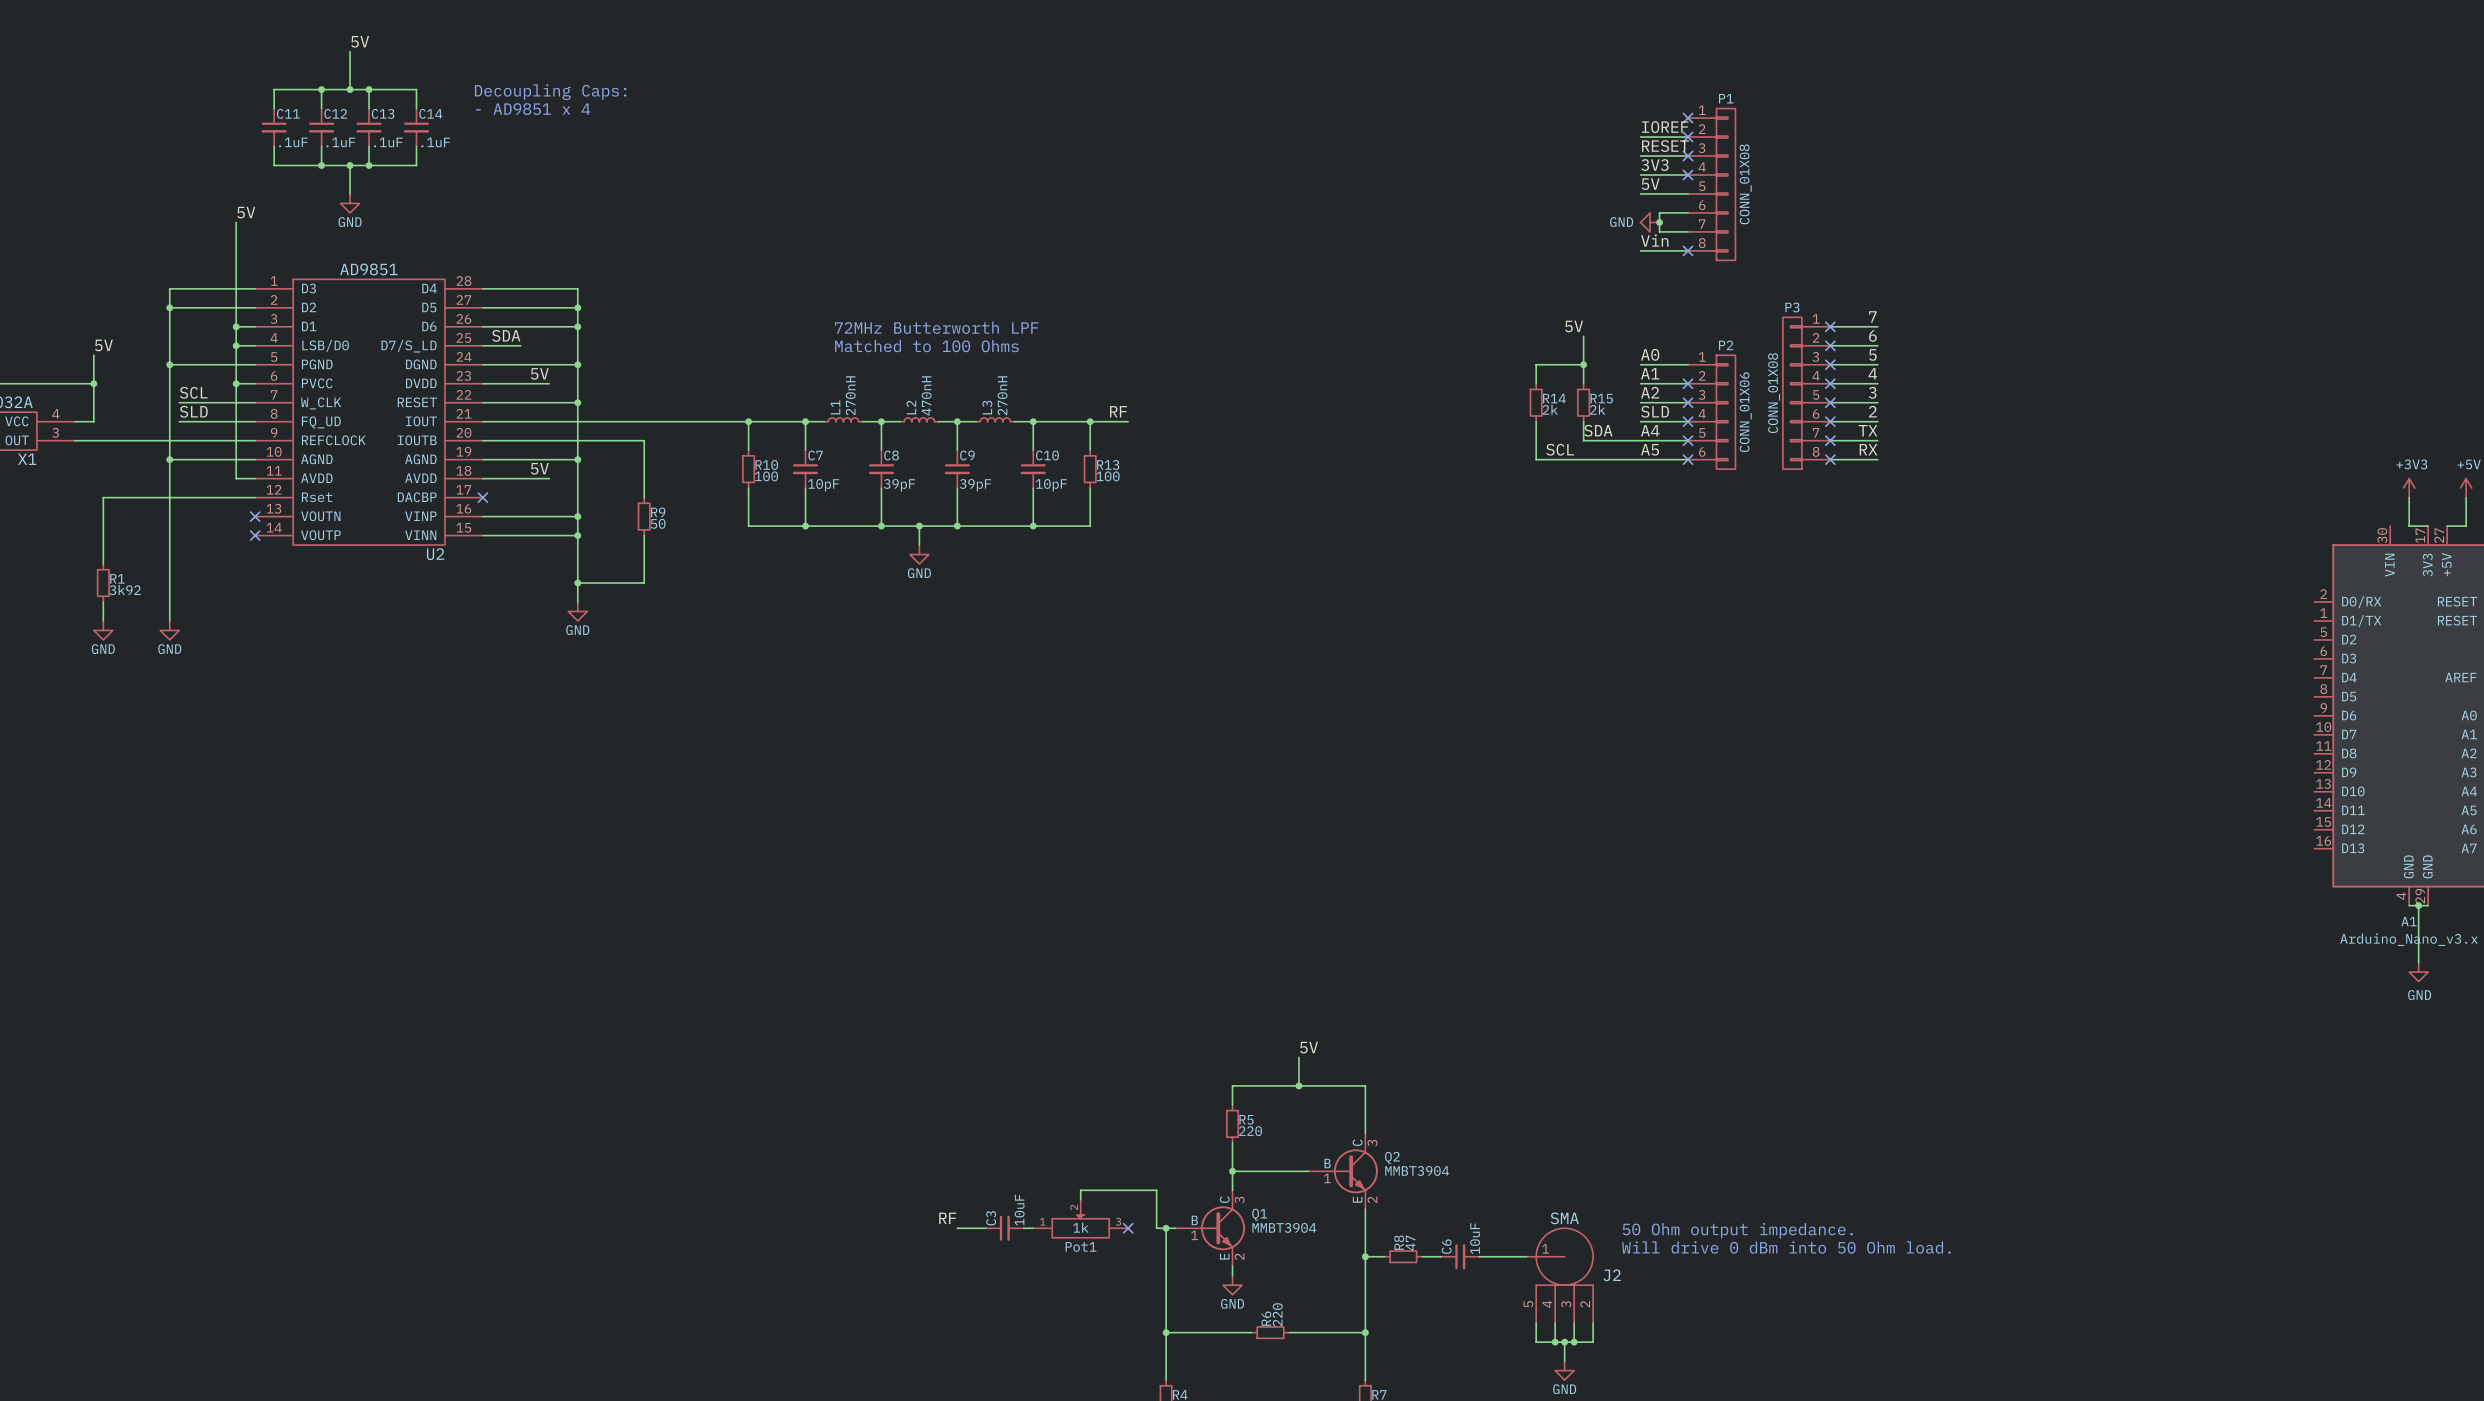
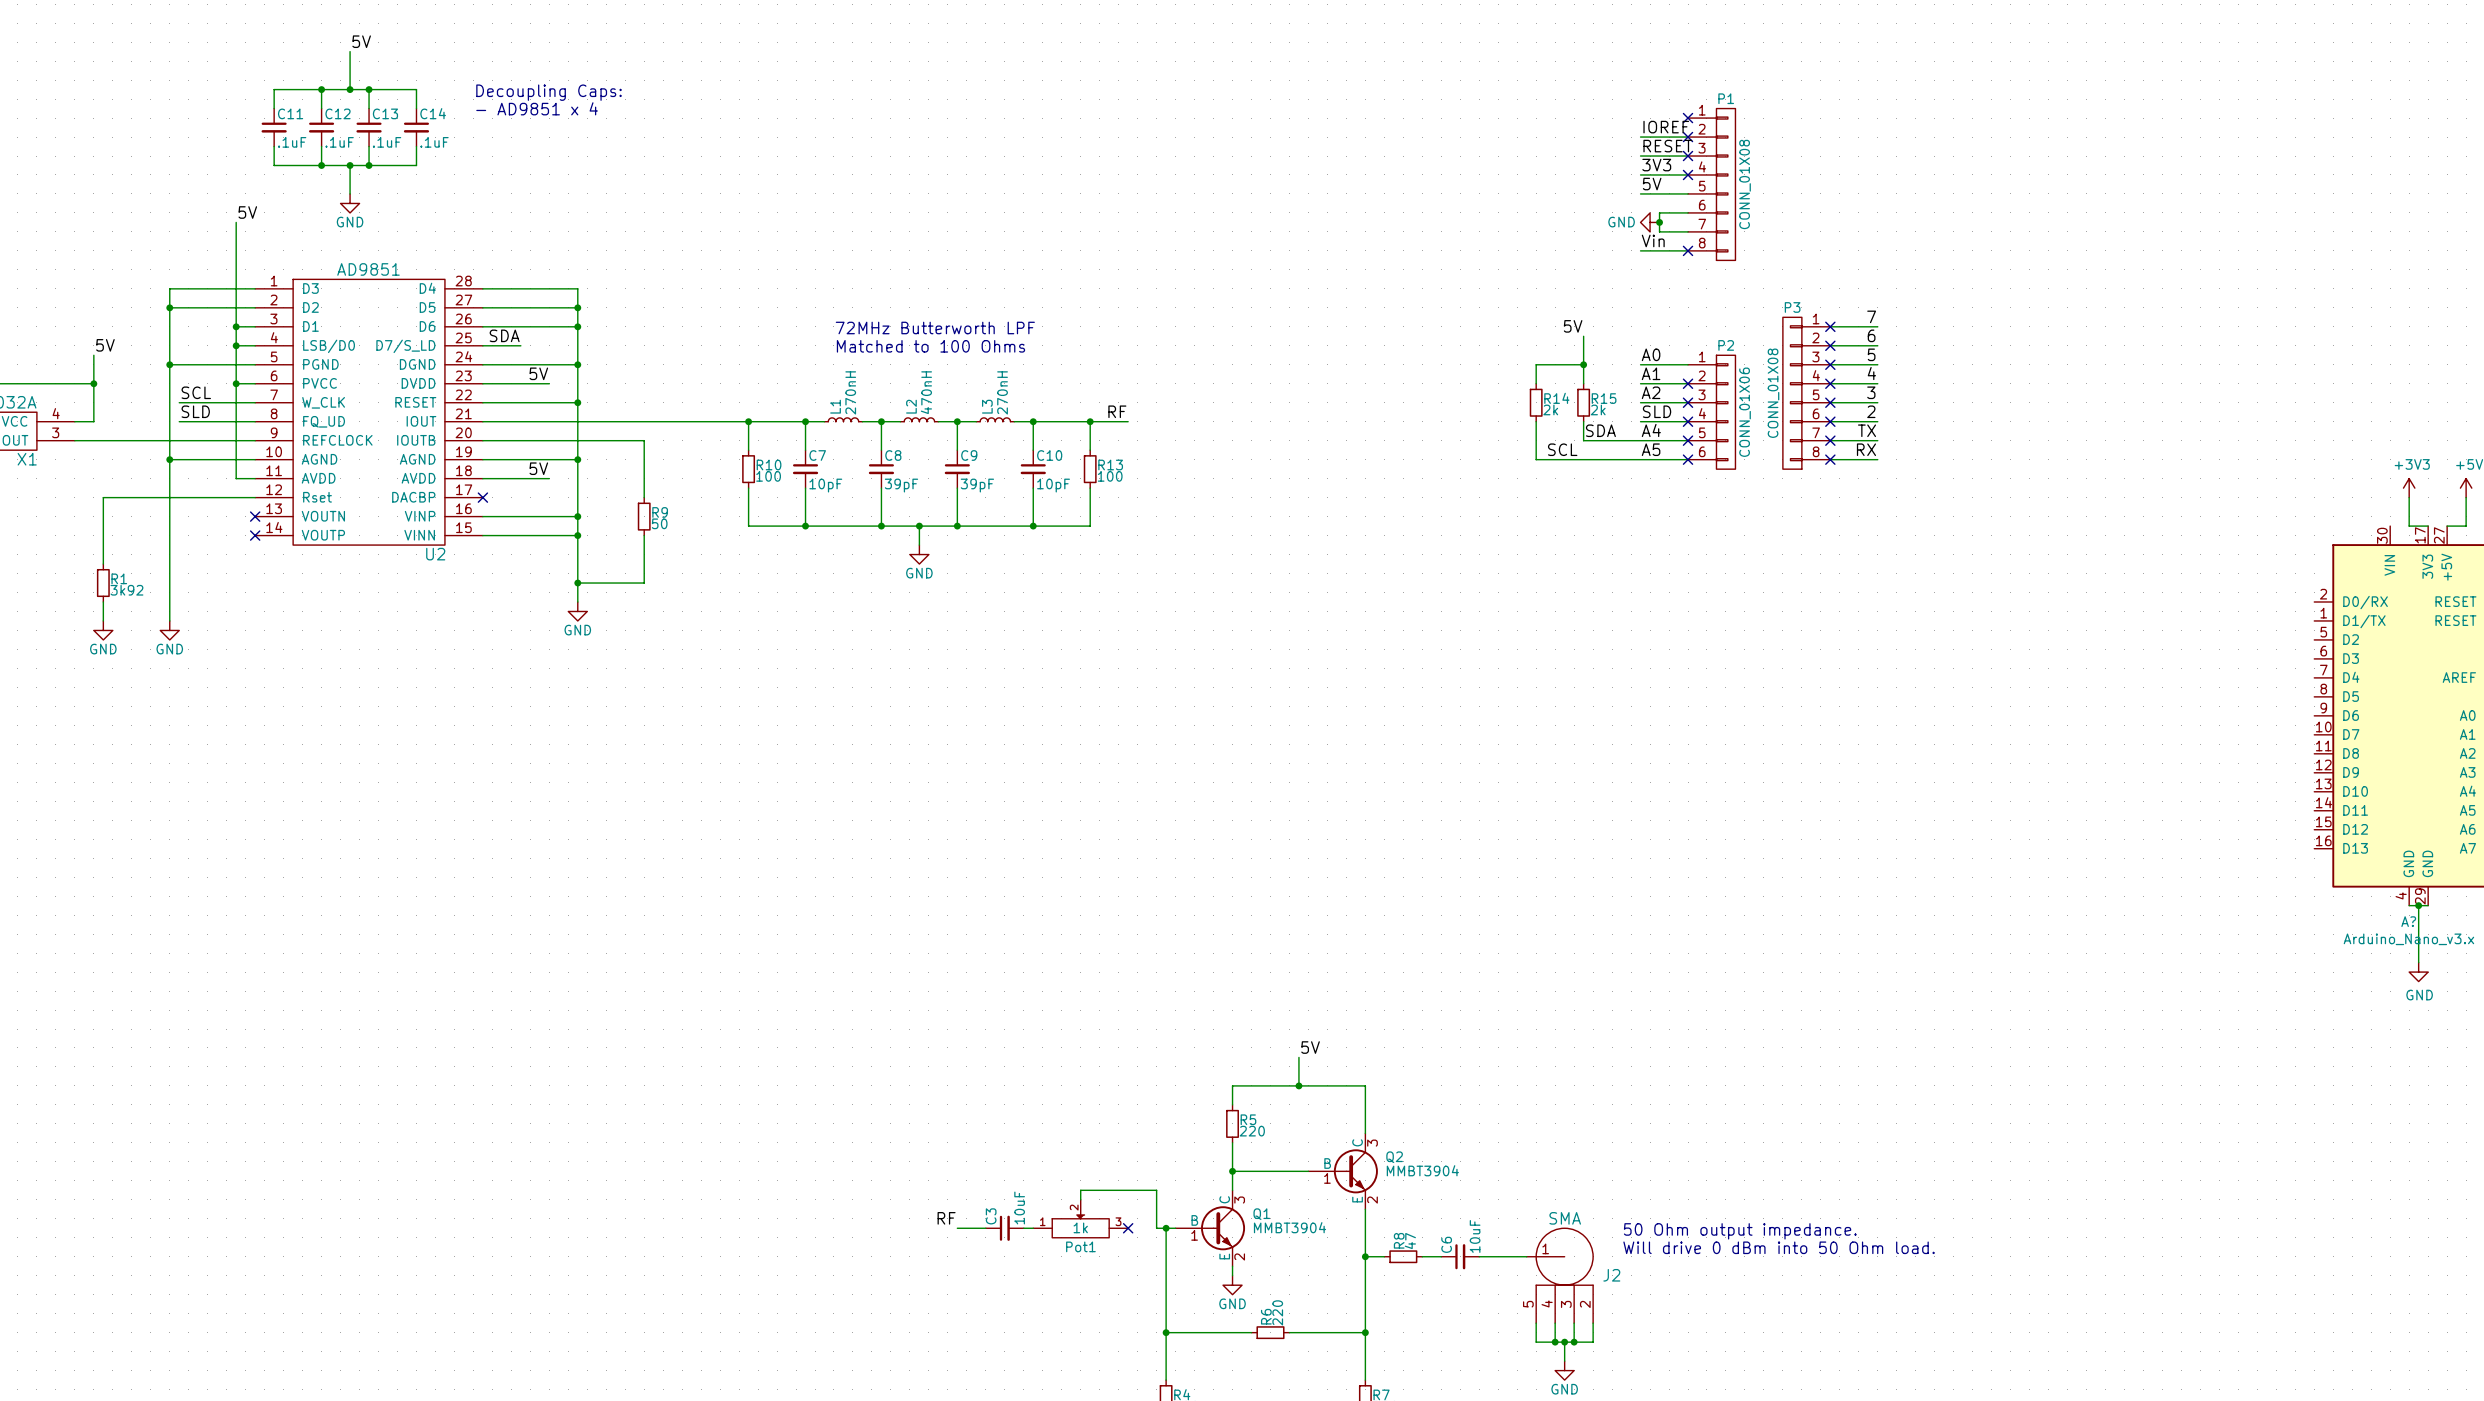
A1 name: A1 (2409, 921) -> A? (2408, 921)

